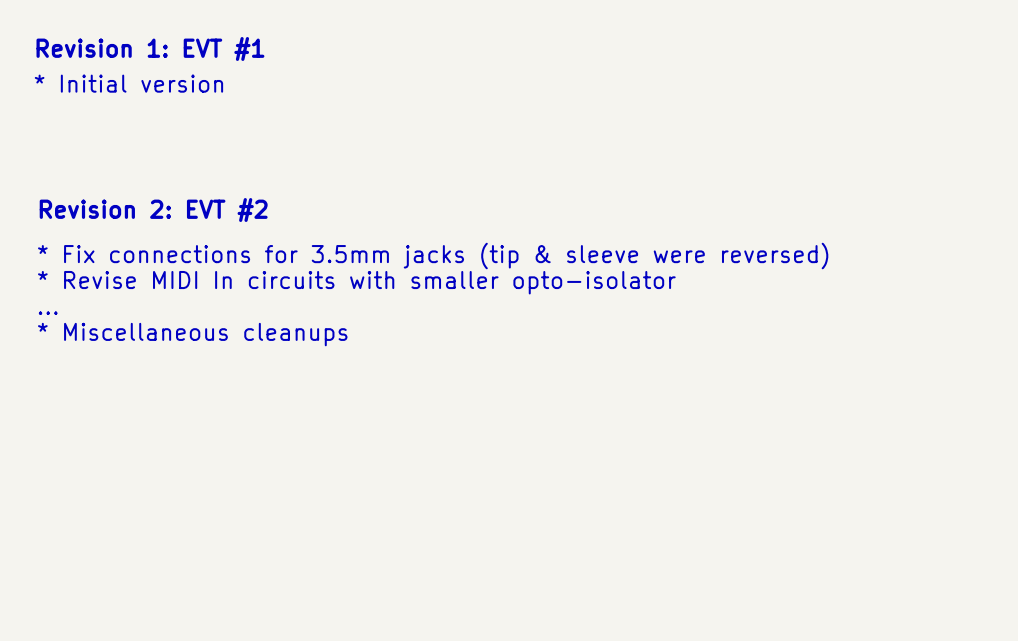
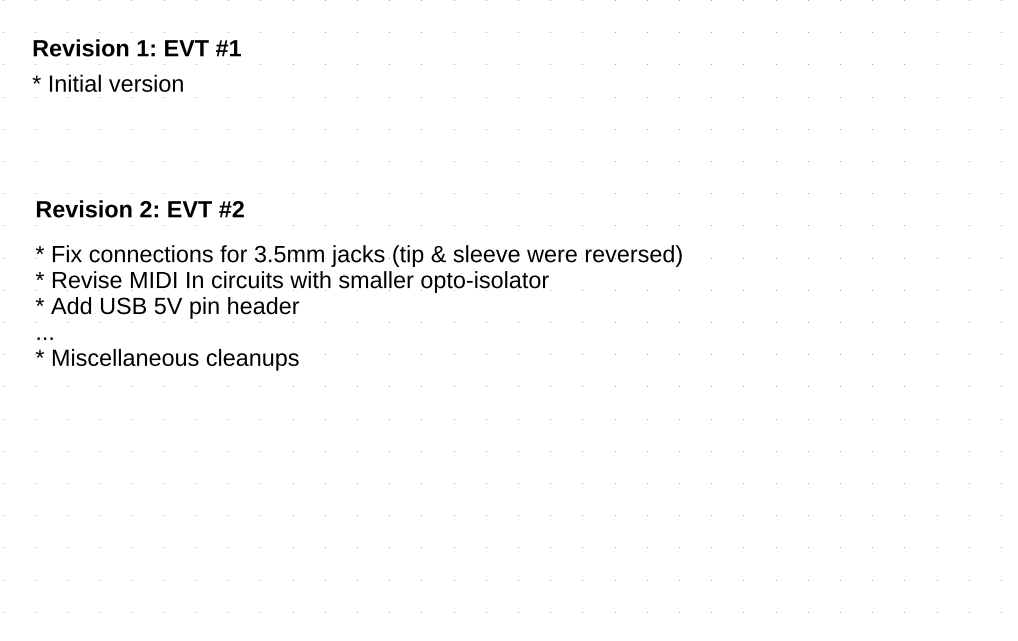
text: ... (48, 313) -> * Add USB 5V pin header (167, 307)
text: * Miscellaneous cleanups (192, 334) -> ... (45, 338)
text: none -> * Miscellaneous cleanups (167, 359)

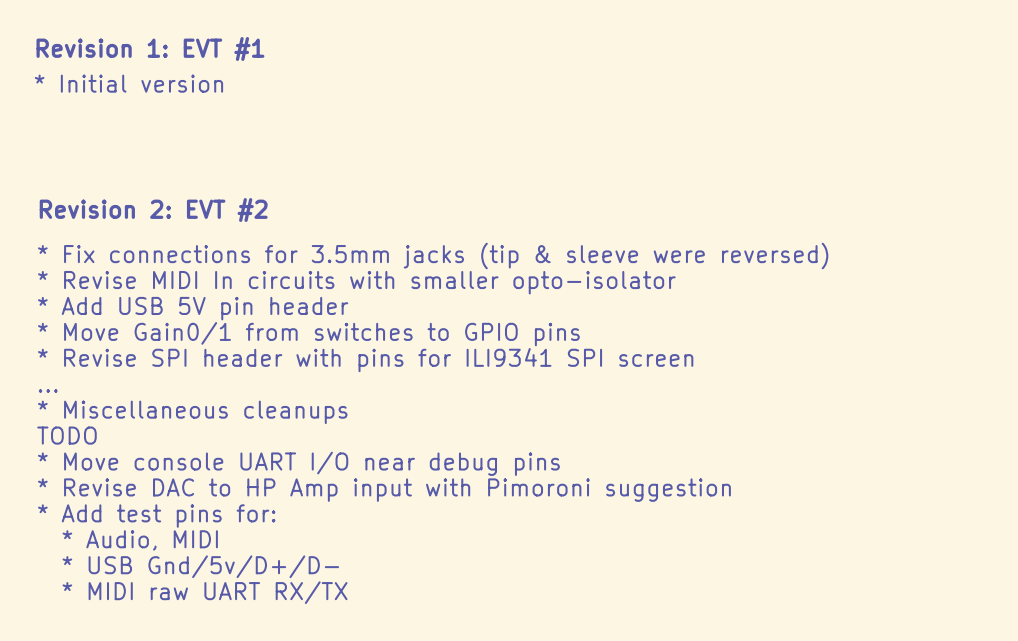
text: ... (45, 338) -> * Move Gain0/1 from switches to GPIO pins (308, 334)
text: * Miscellaneous cleanups (167, 359) -> * Revise SPI header with pins for ILI9341 SPI screen (365, 360)
text: none -> ... (48, 391)
text: none -> * Miscellaneous cleanups (192, 412)
text: none -> TODO (66, 435)
text: none -> * Move console UART I/O near debug pins (298, 463)
text: none -> * Revise DAC to HP Amp input with Pimoroni suggestion (384, 490)
text: none -> * Add test pins for: (156, 516)
text: none -> * Audio, MIDI (140, 540)
text: none -> * USB Gnd/5v/D+/D- (200, 566)
text: none -> * MIDI raw UART RX/TX (205, 592)

